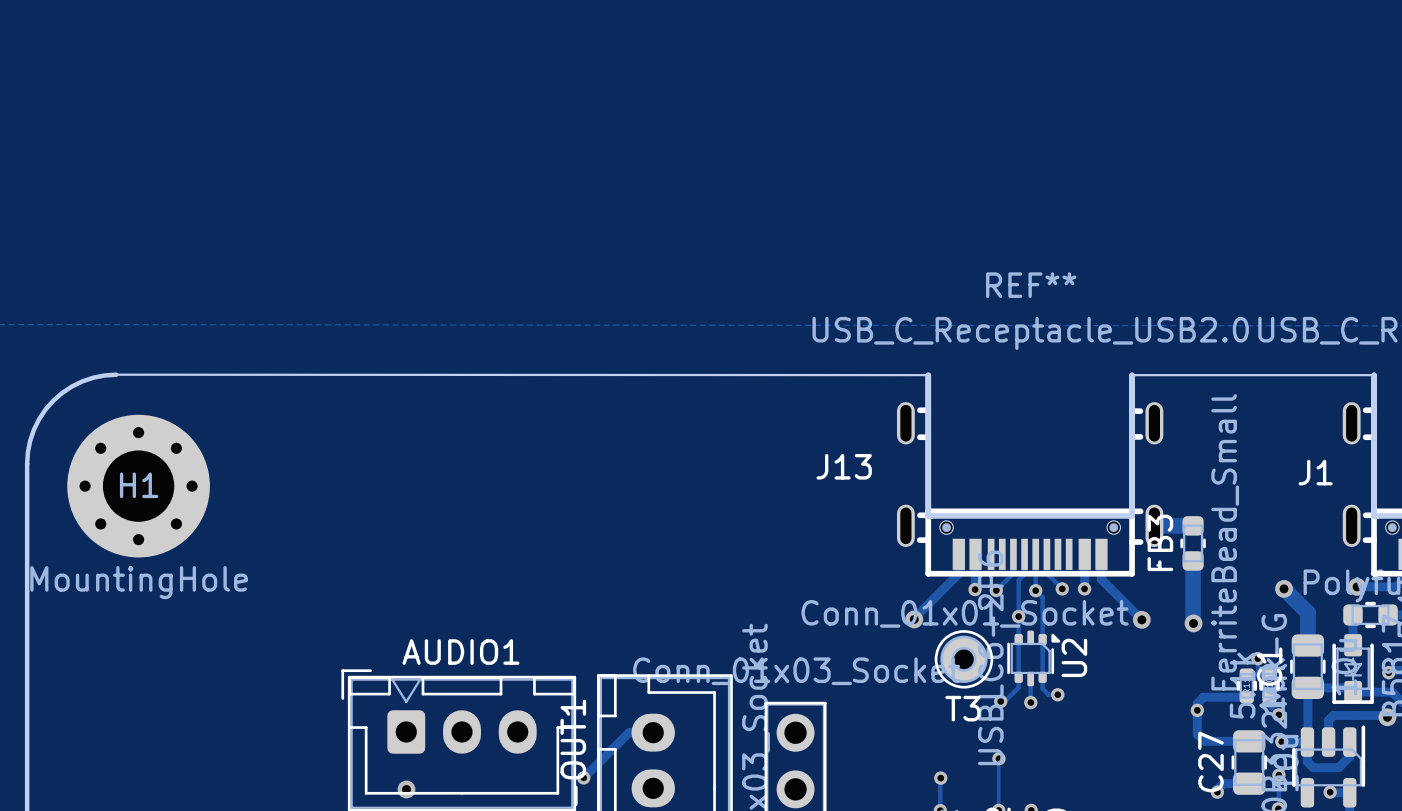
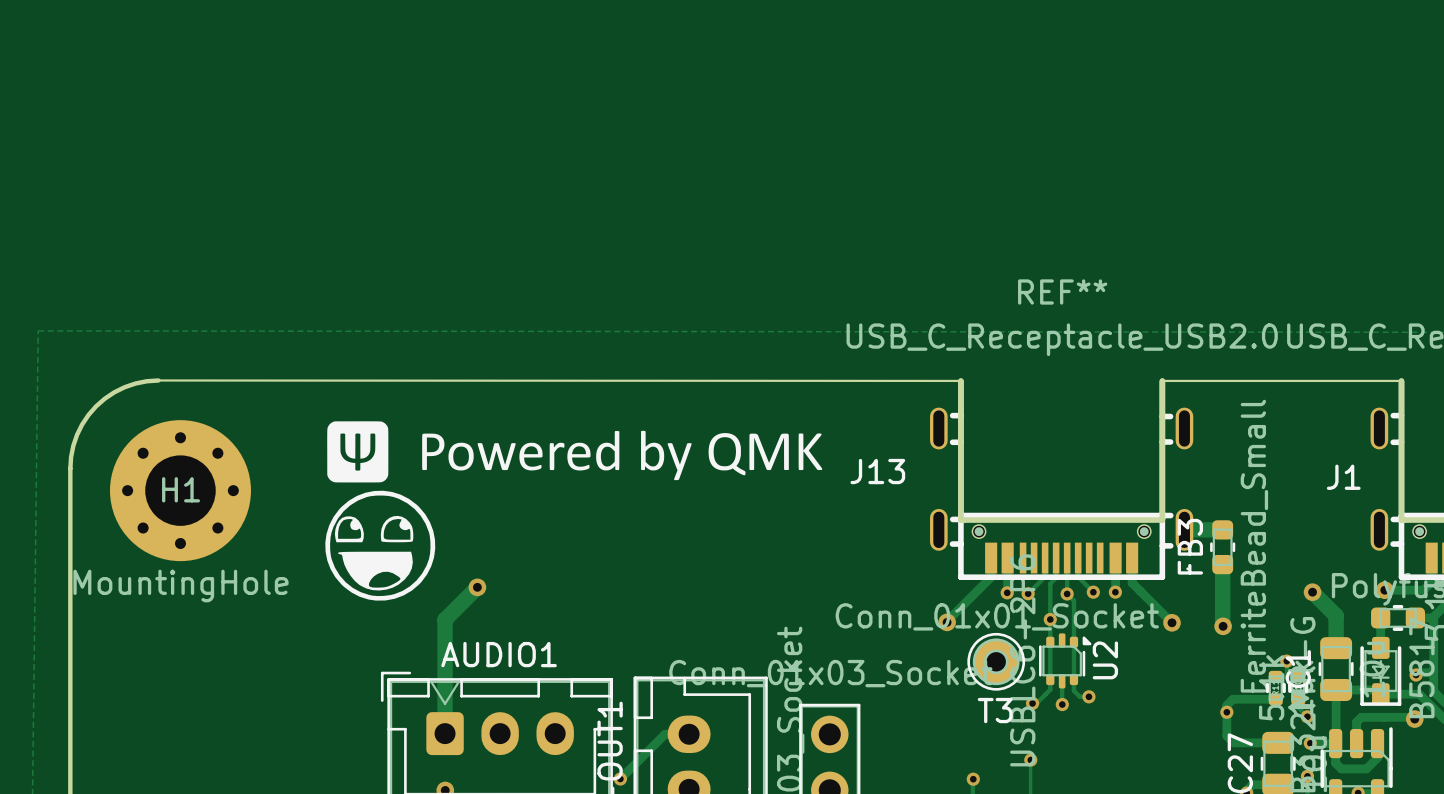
drawing: none -> [325, 421, 823, 601]
track: none -> (477, 587) (445, 619) (445, 733)
via: none -> (477, 587)

